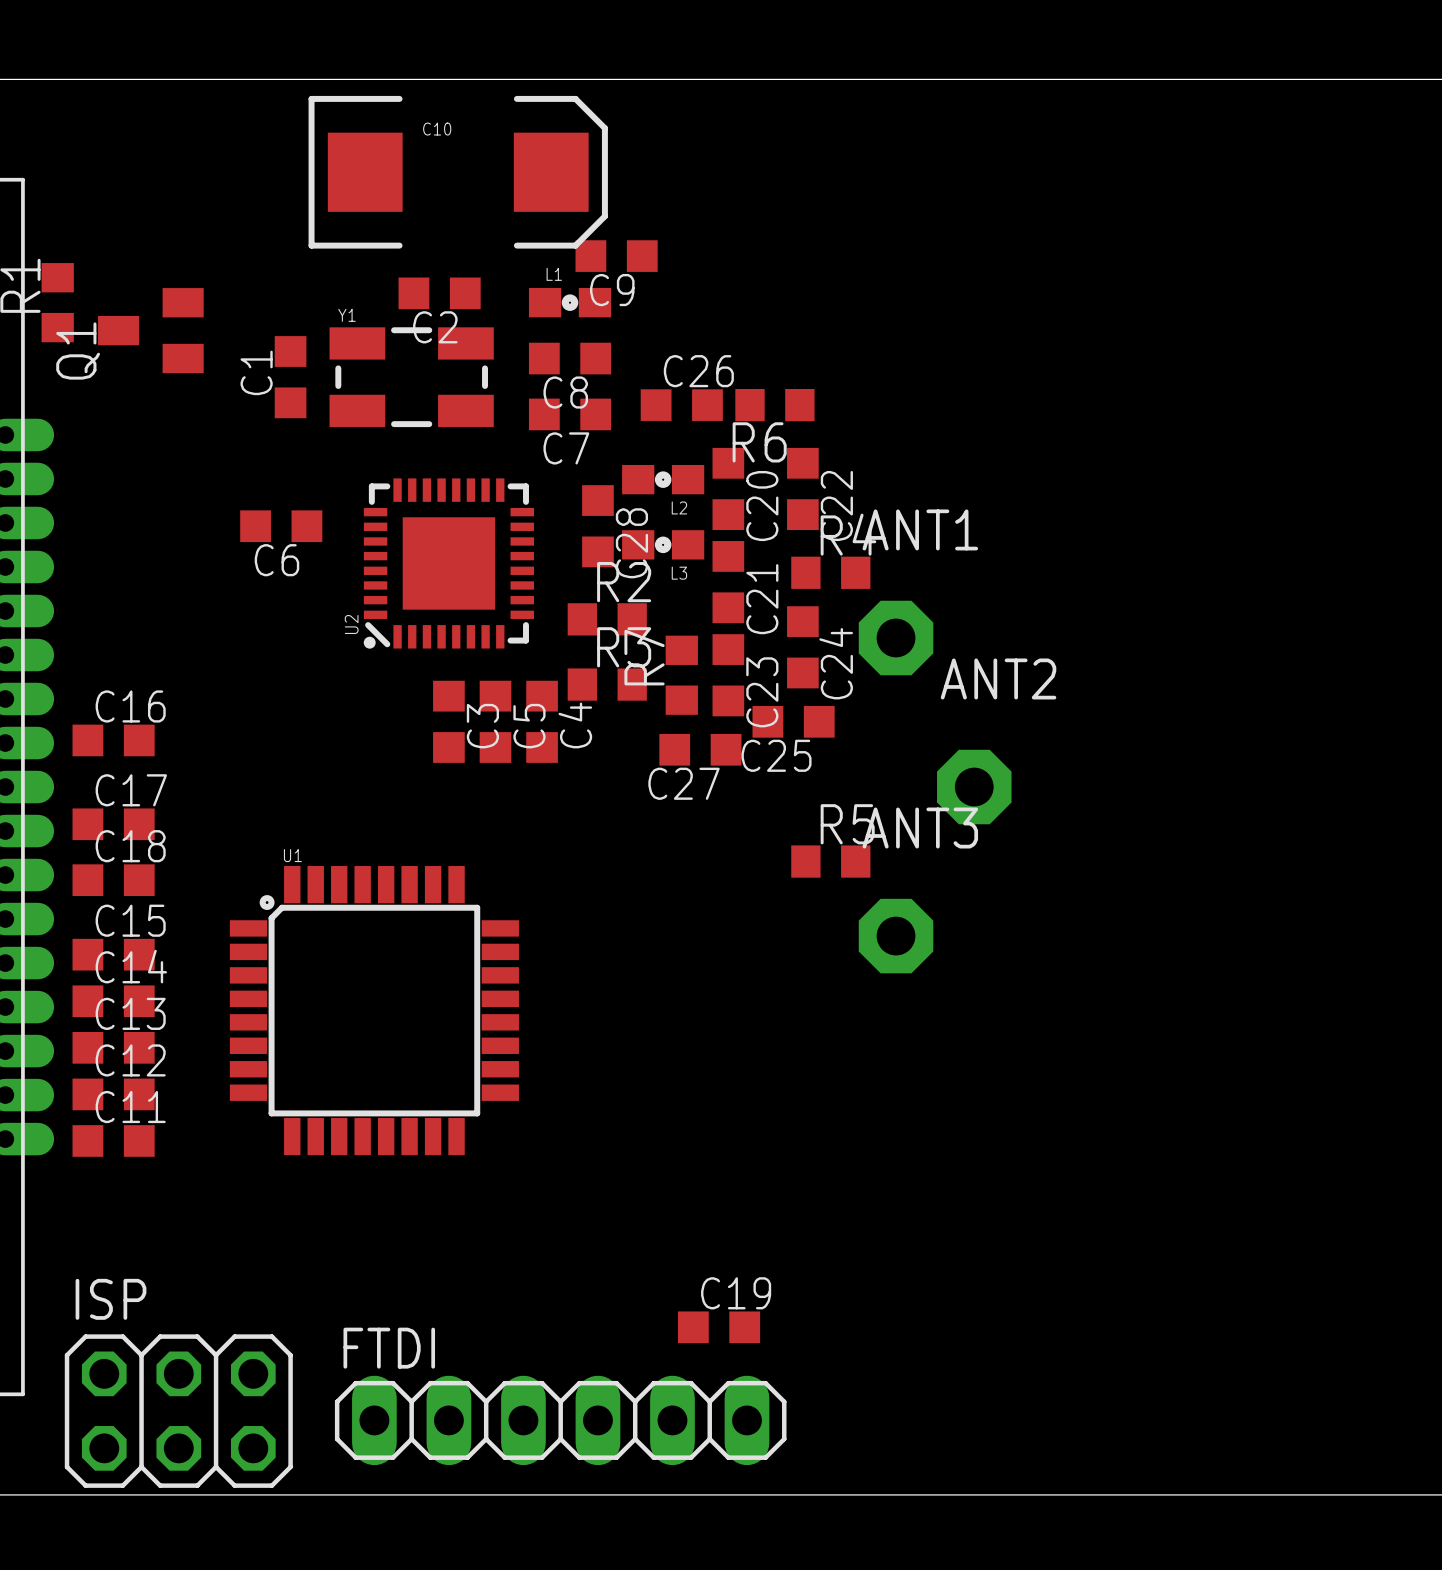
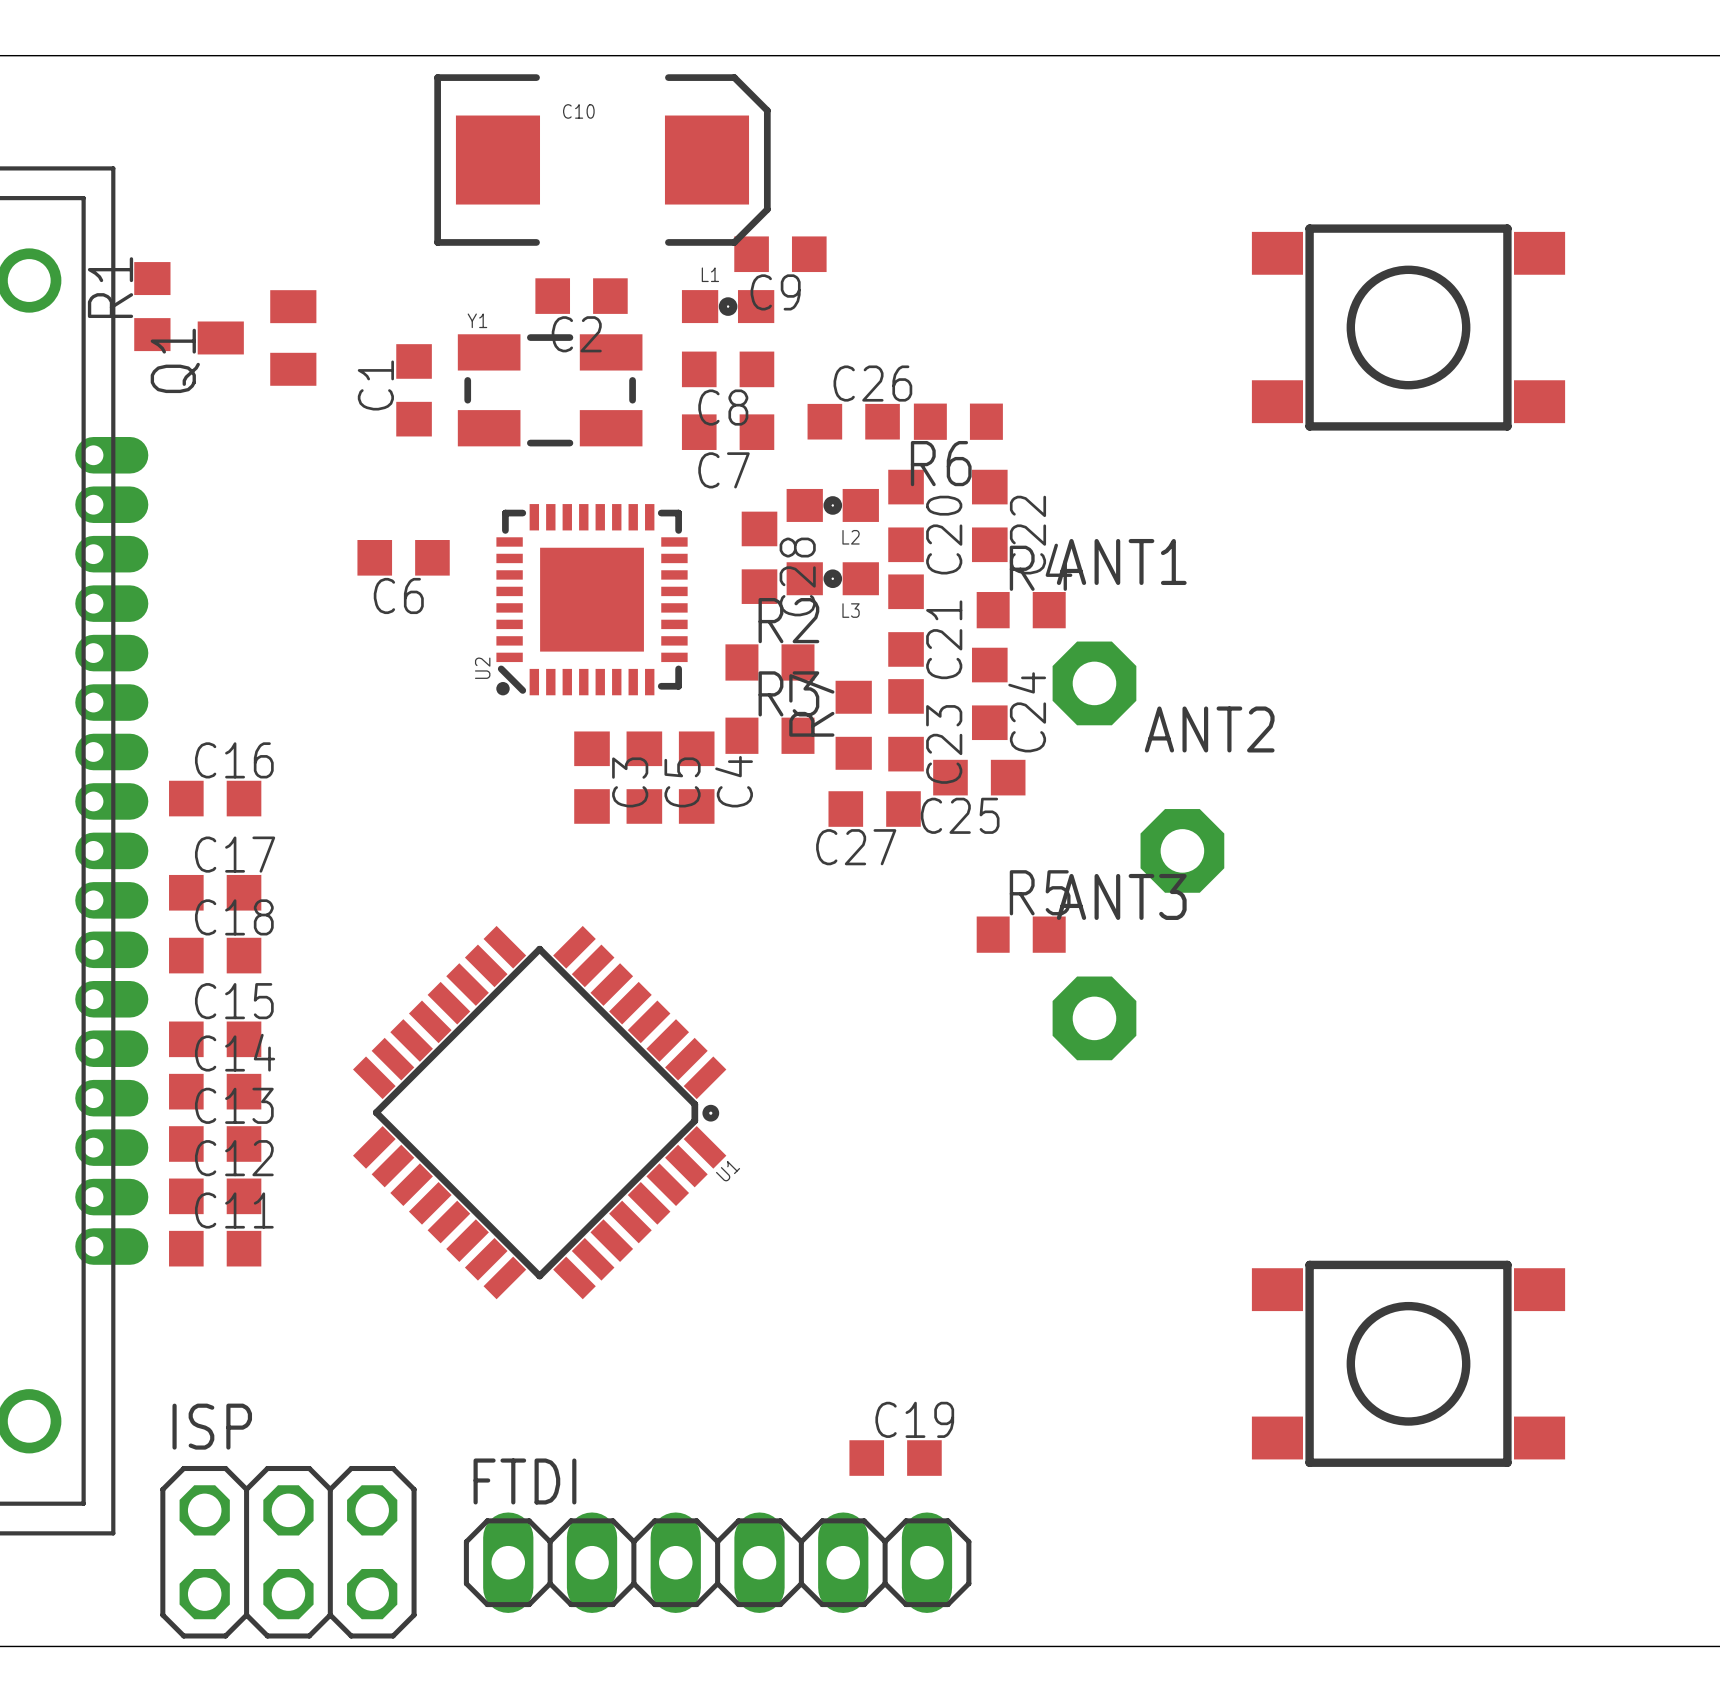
part: none -> (1408, 327)
U1 rotation: 0° (374, 1010) -> 135° clockwise (539, 1112)
part: none -> (1408, 1363)

